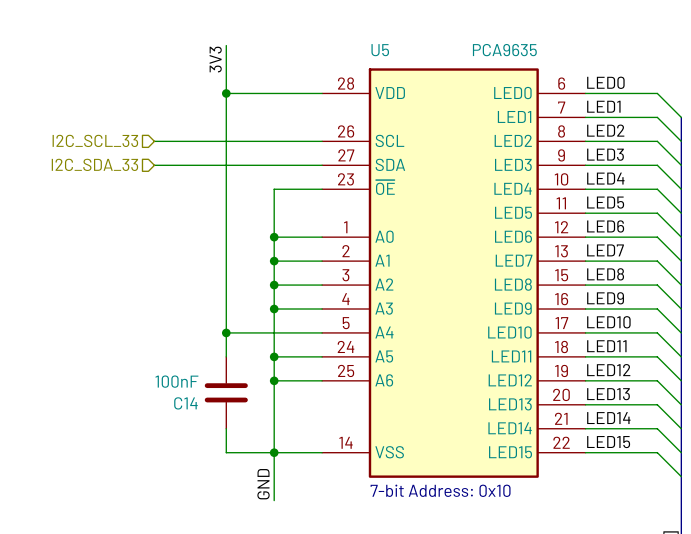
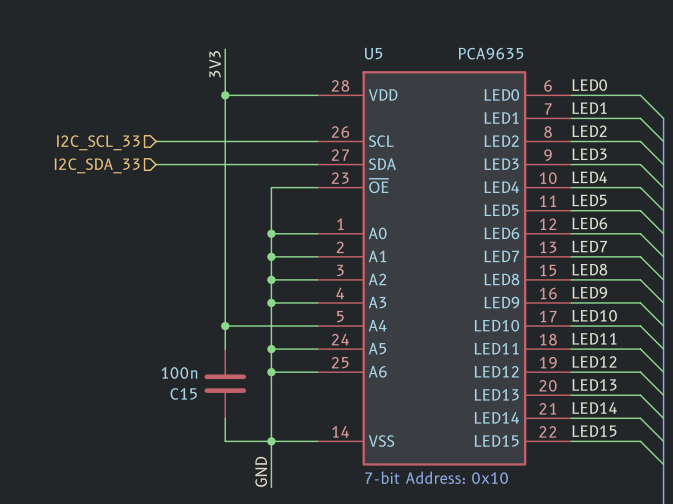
C14 value: 100nF (176, 381) -> 100n (179, 372)
C14 name: C14 (185, 403) -> C15 (183, 393)

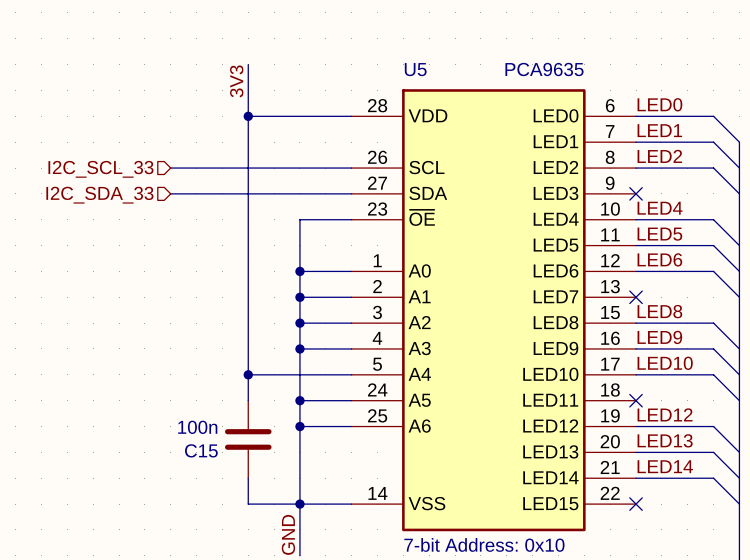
label: LED3 (589, 154) -> none
wire: (571, 164) (640, 164) (663, 187) -> none
no-connect mark: none -> (636, 193)
label: LED7 (589, 246) -> none
wire: (571, 256) (640, 256) (663, 279) -> none
no-connect mark: none -> (636, 297)
label: LED11 (594, 338) -> none
wire: (571, 349) (640, 349) (663, 372) -> none
no-connect mark: none -> (636, 400)
label: LED15 (594, 431) -> none
wire: (571, 441) (640, 441) (663, 464) -> none
no-connect mark: none -> (636, 504)

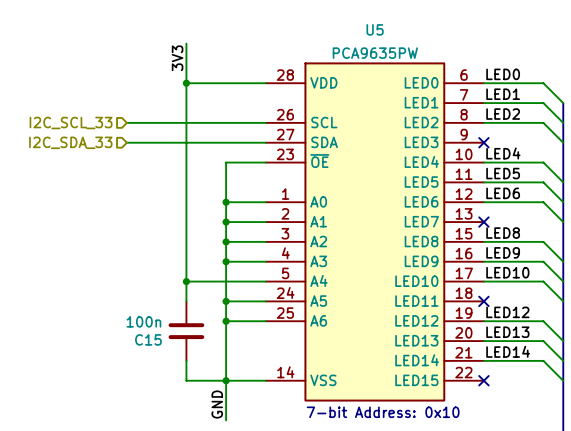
U5 name position: U5 (415, 69) -> U5 (375, 29)
U5 value: PCA9635 (544, 69) -> PCA9635PW (375, 53)

